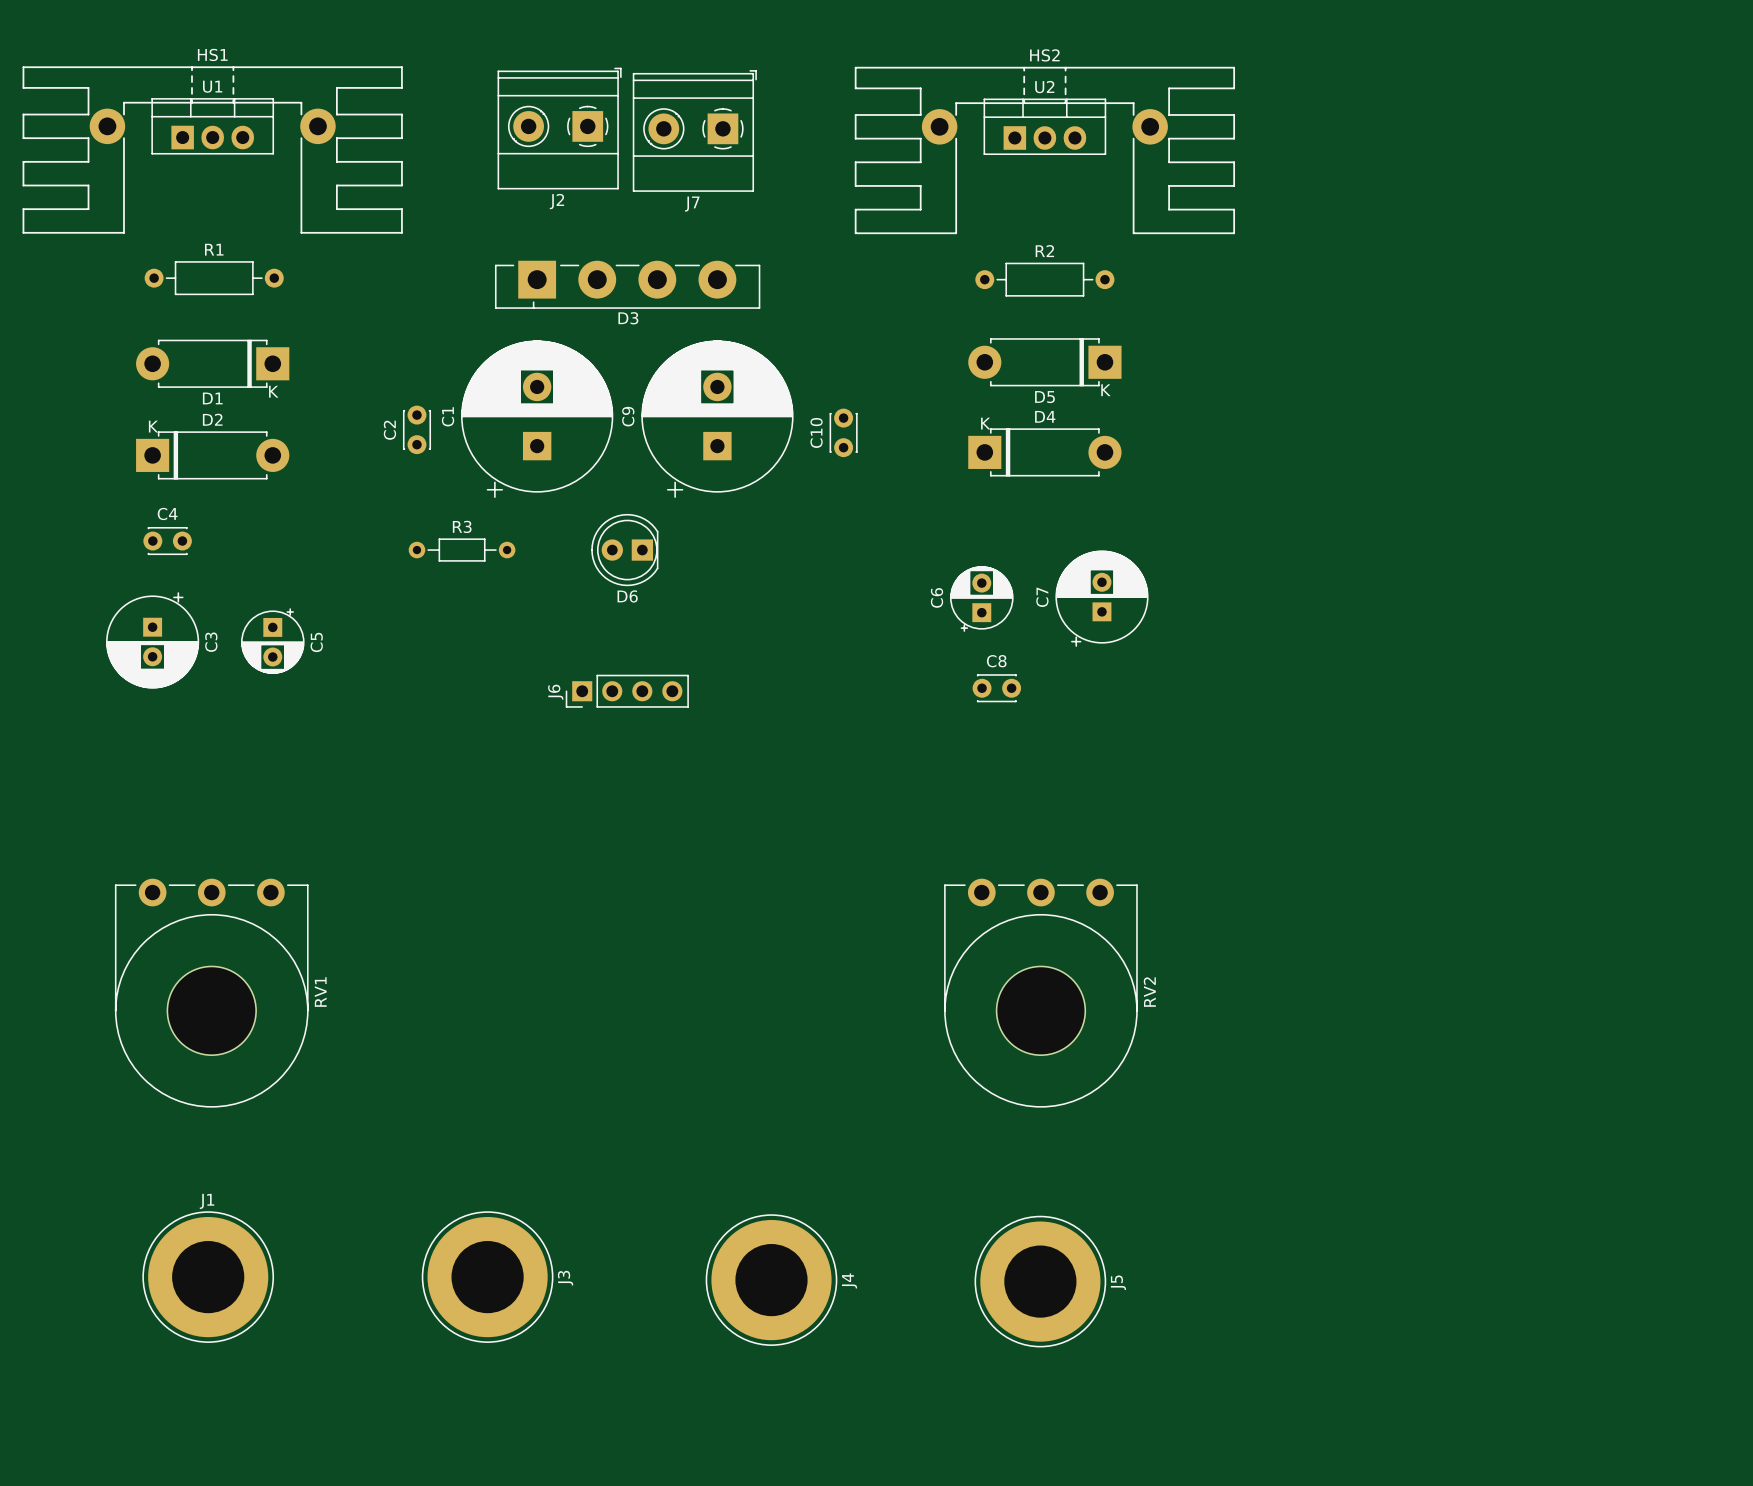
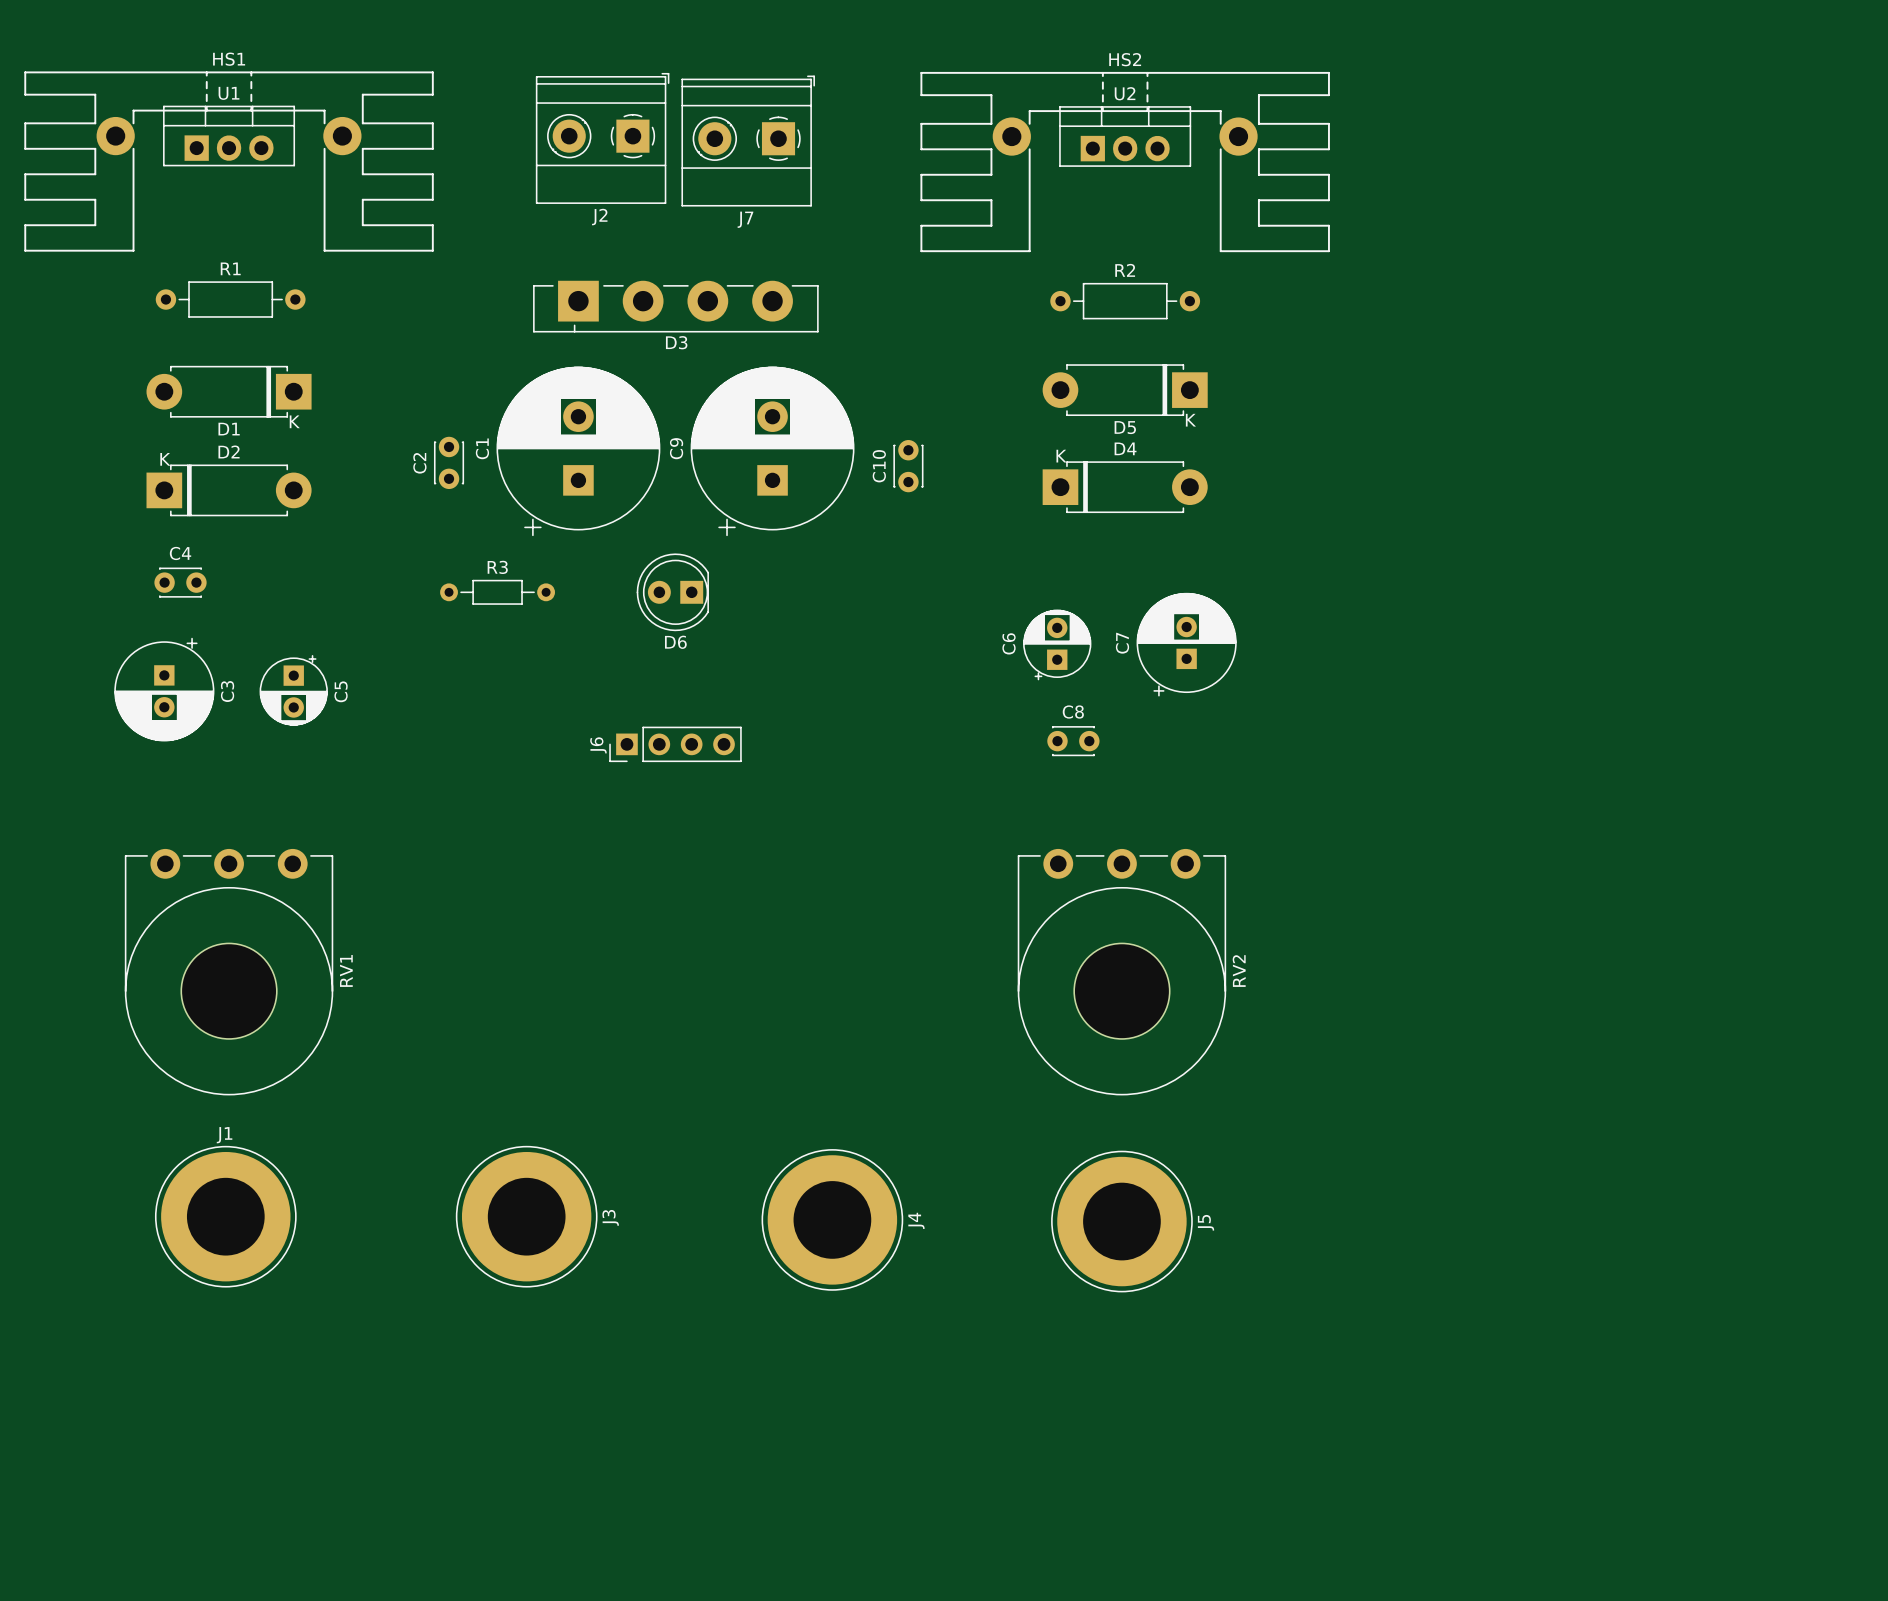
RV1 position: (211, 993) -> (229, 972)
RV2 position: (1040, 993) -> (1121, 972)
J1 position: (208, 1277) -> (225, 1216)
J3 position: (487, 1277) -> (526, 1216)
J4 position: (771, 1280) -> (832, 1219)
J5 position: (1040, 1281) -> (1121, 1221)

